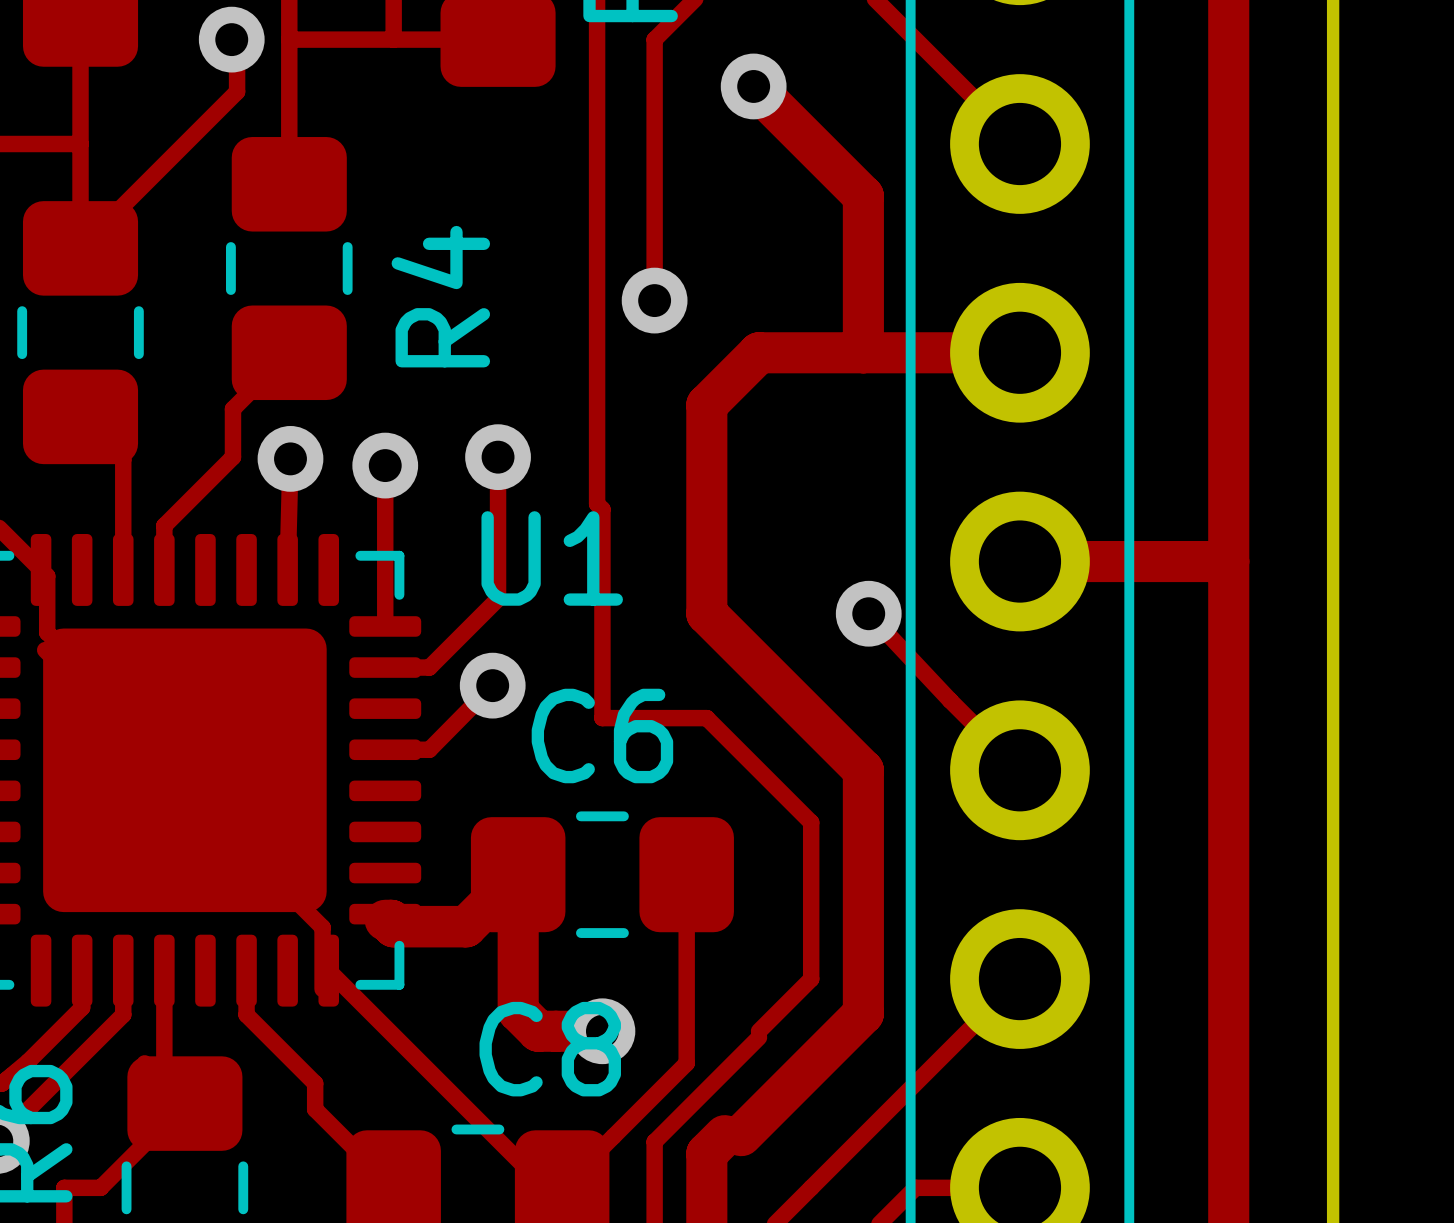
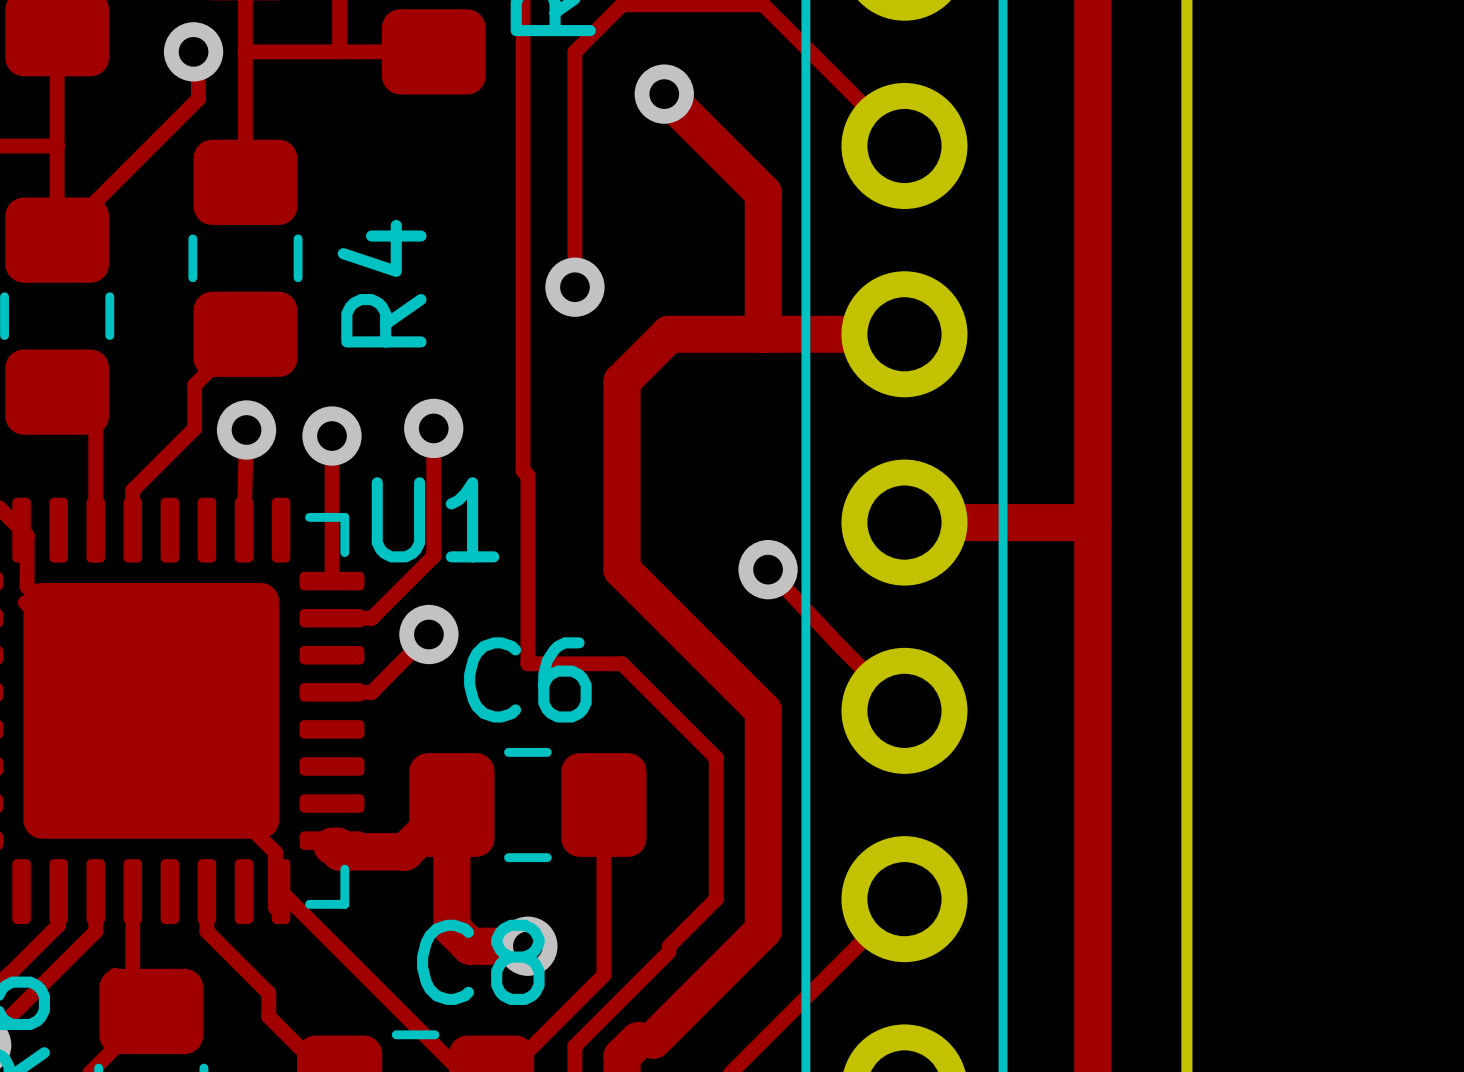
U1 name position: U1 (552, 558) -> U1 (435, 519)

